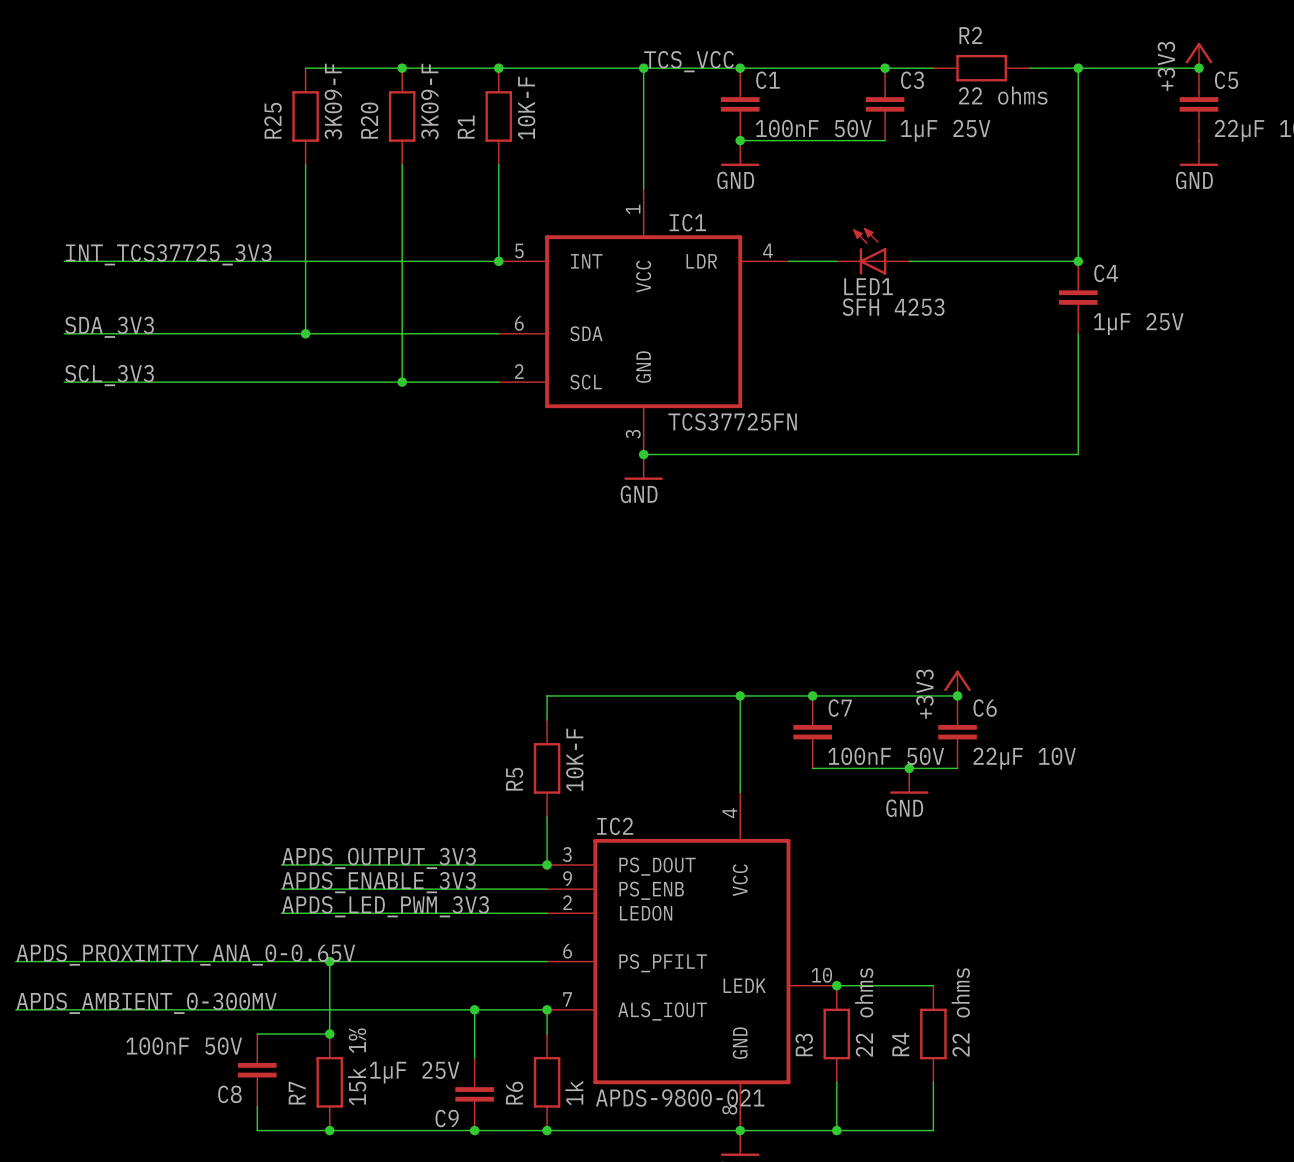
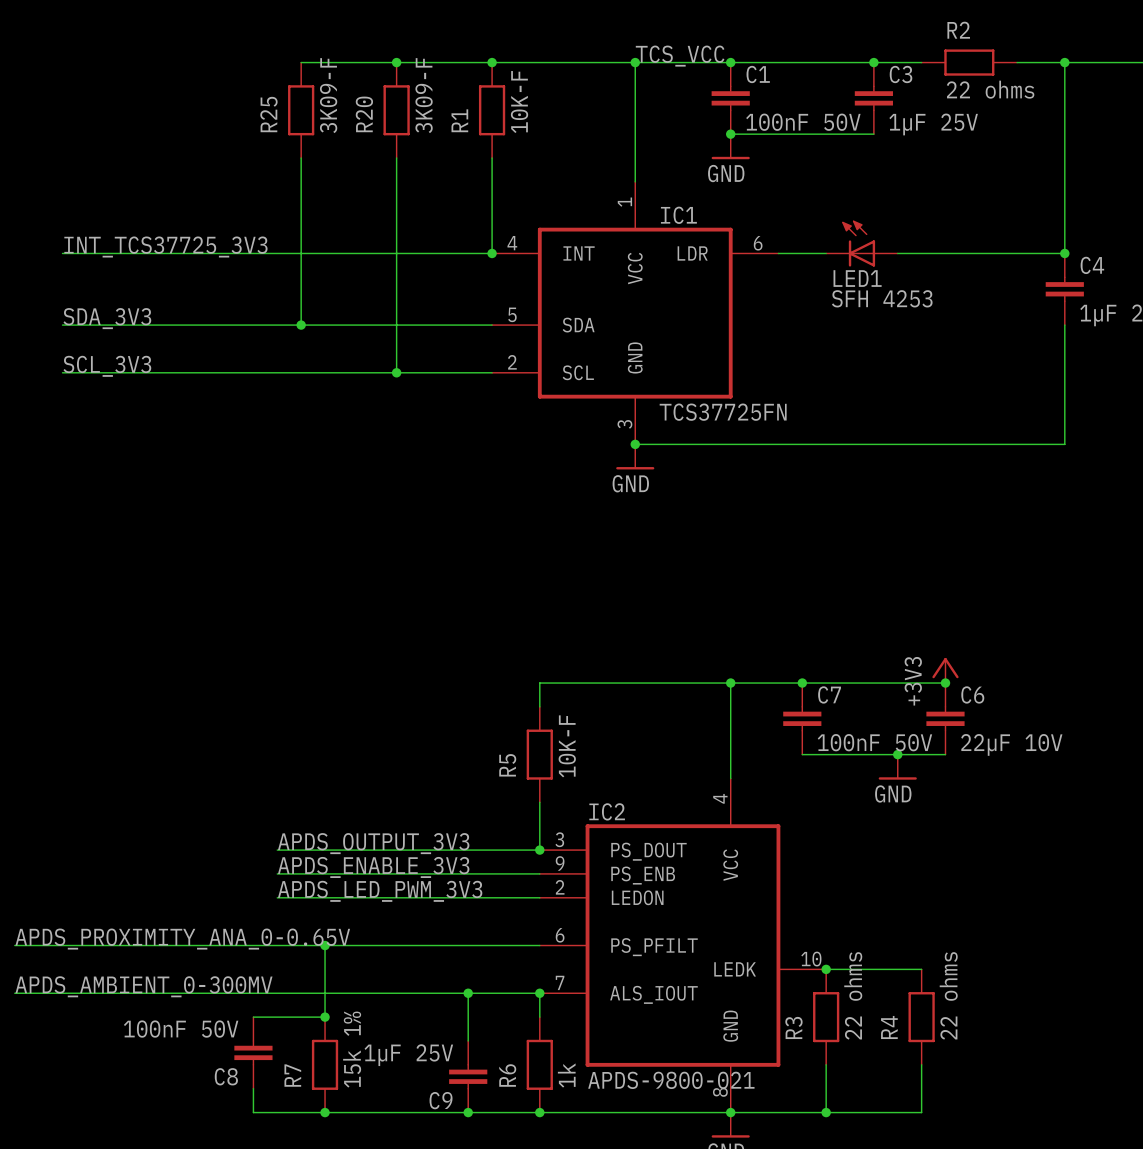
IC1 pin number: 4 (767, 250) -> 6 (758, 243)
IC1 pin number: 5 (519, 251) -> 4 (512, 243)
IC1 pin number: 6 (519, 323) -> 5 (512, 314)

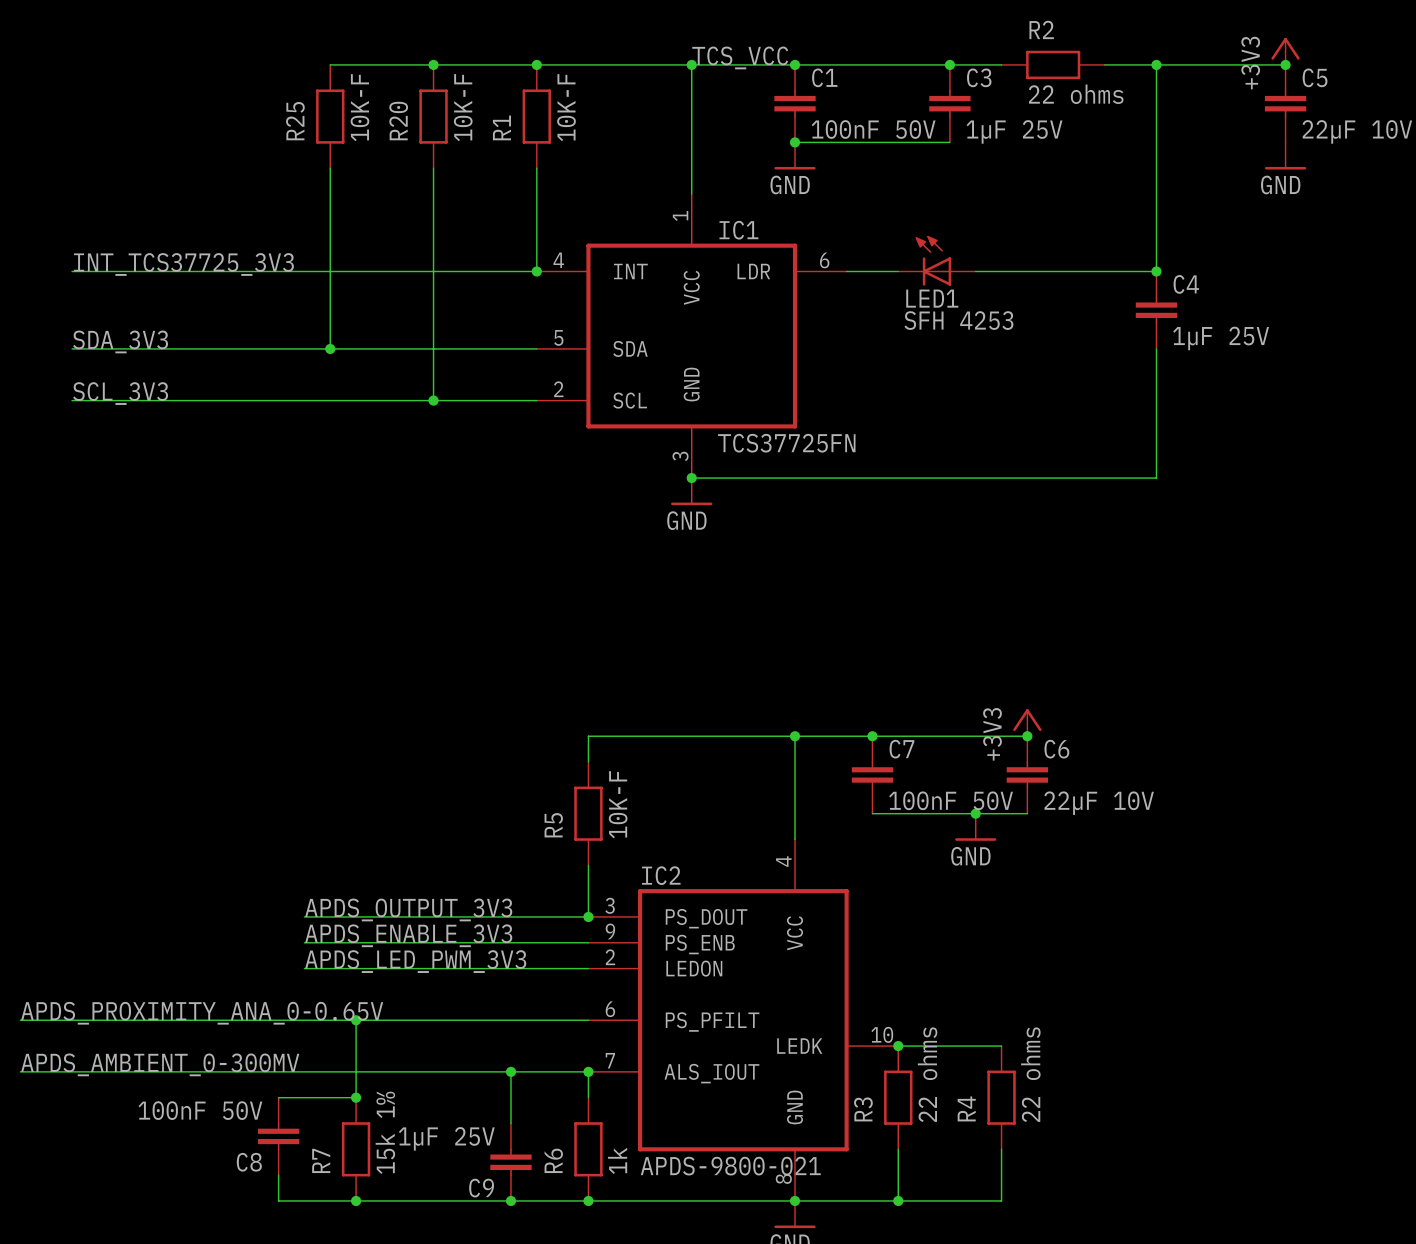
R25 value: 3K09-F (328, 95) -> 10K-F (359, 107)
R20 value: 3K09-F (424, 95) -> 10K-F (463, 107)

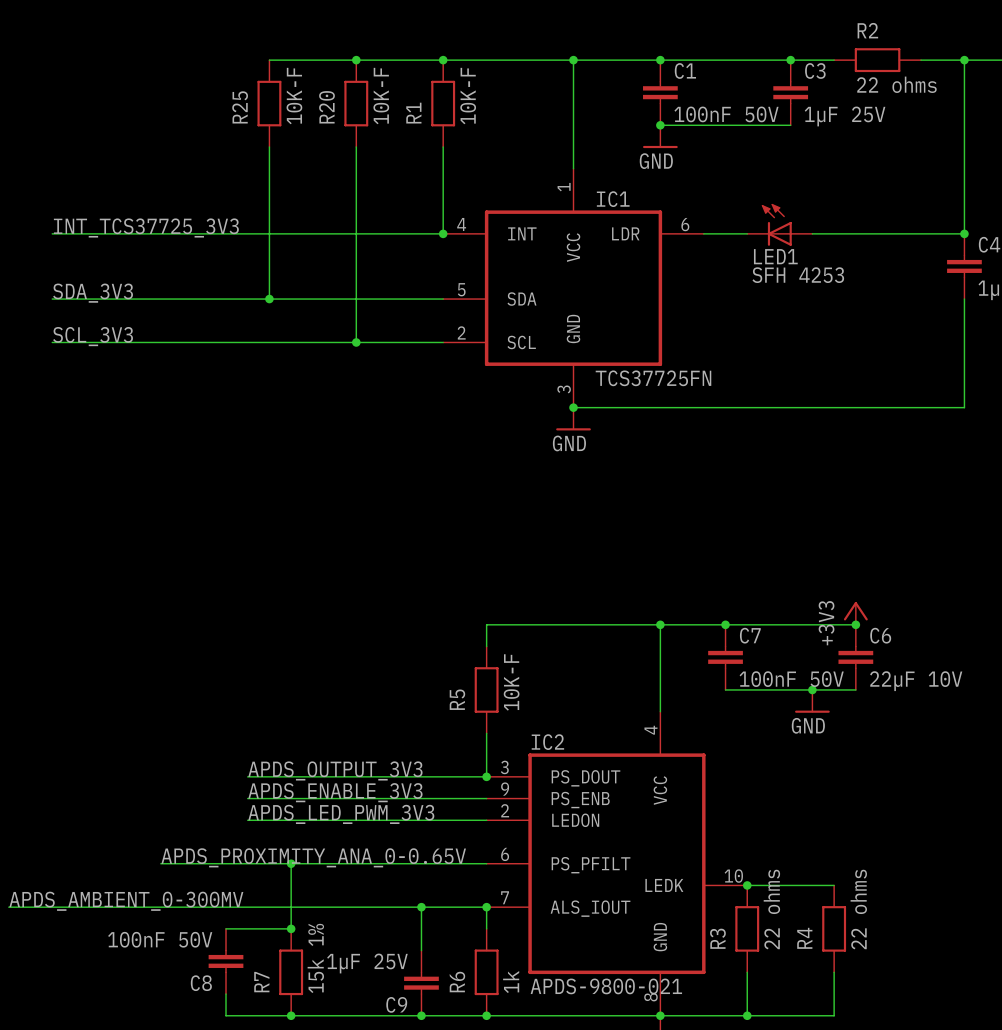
label: TCS_VCC (740, 57) -> none
label position: APDS_PROXIMITY_ANA_0-0.65V (202, 1013) -> APDS_PROXIMITY_ANA_0-0.65V (313, 857)
wire: (20, 1020) (201, 1020) -> none

